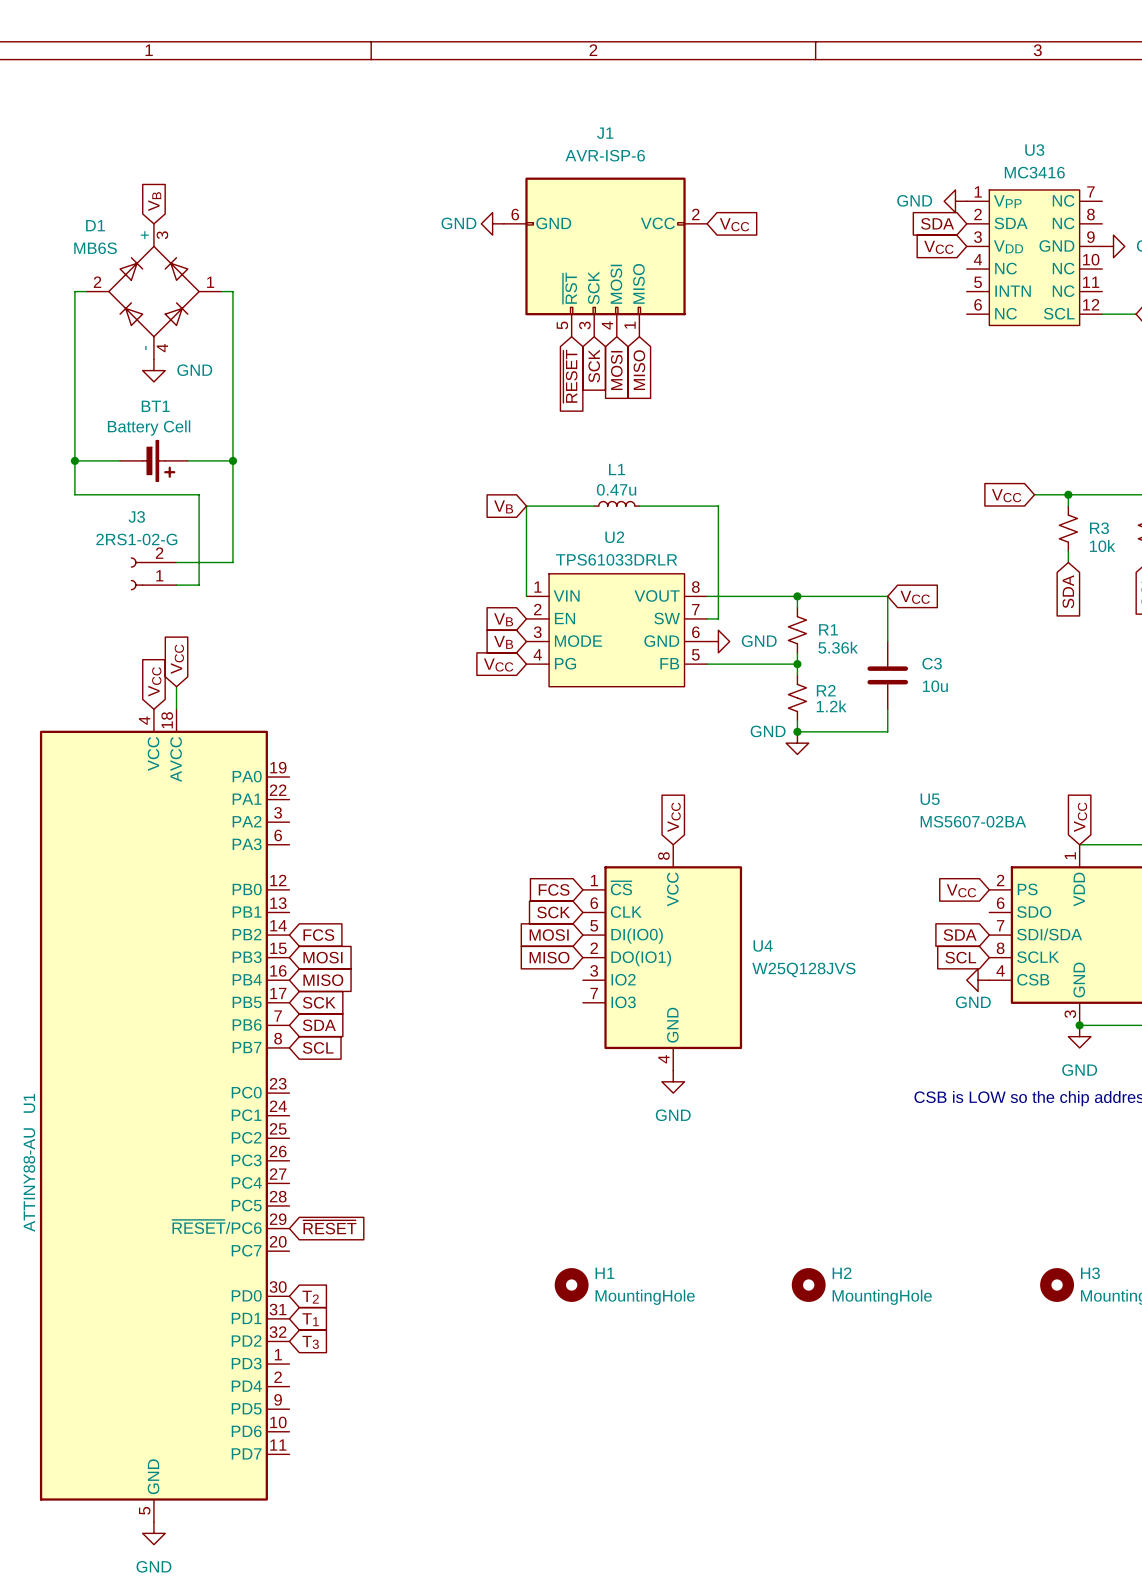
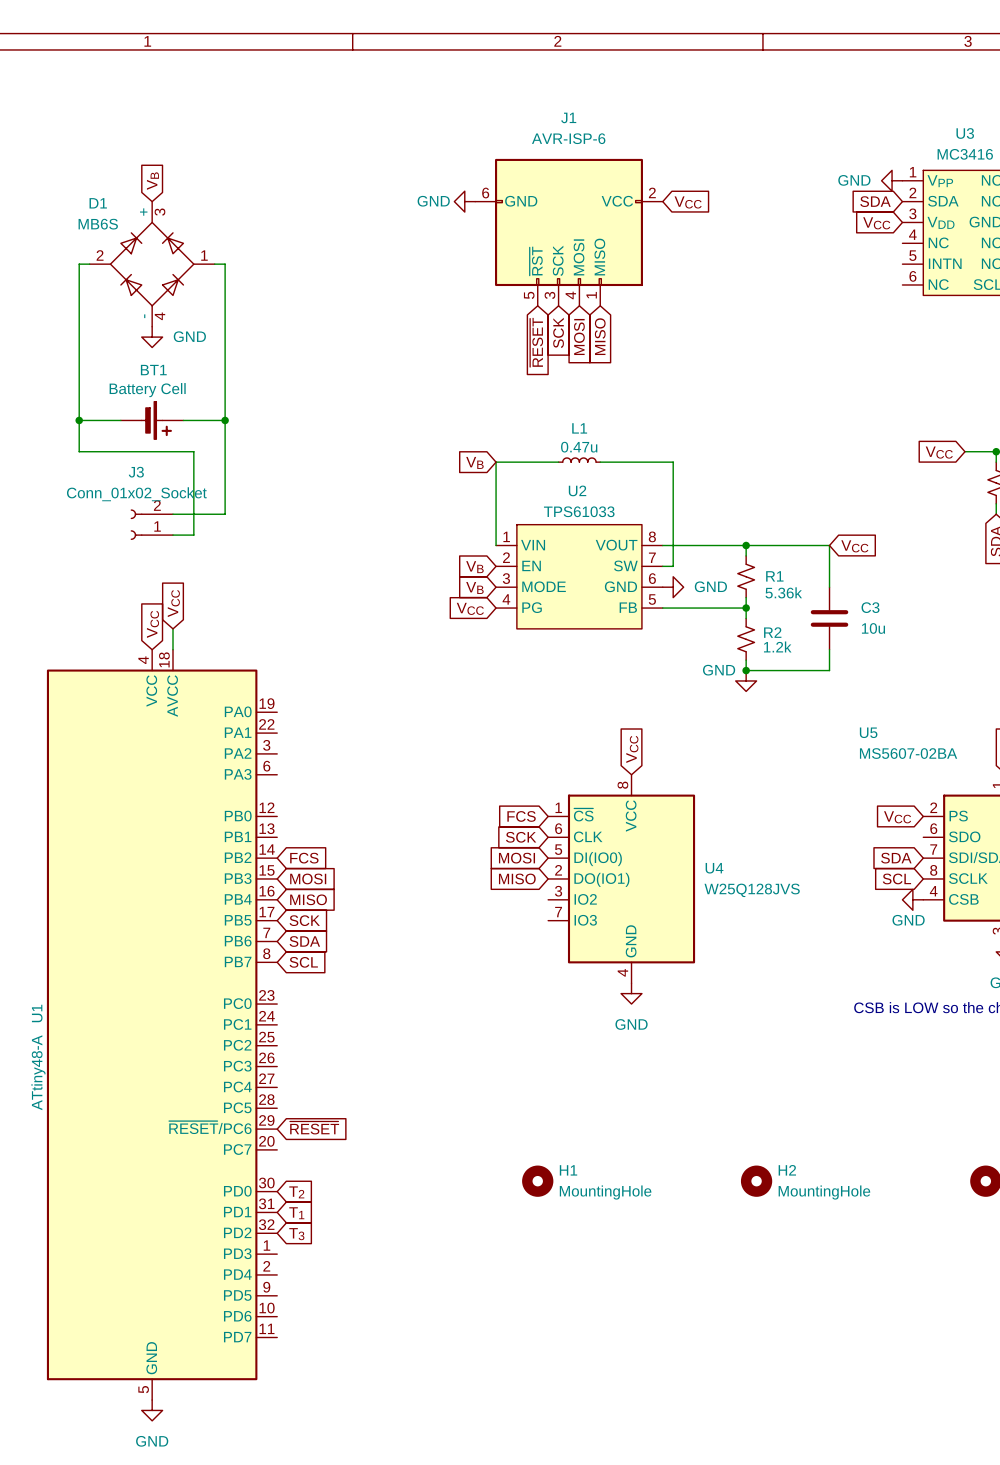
J3 value: 2RS1-02-G (136, 539) -> Conn_01x02_Socket (136, 494)
U2 value: TPS61033DRLR (616, 559) -> TPS61033 (579, 511)
U1 value: ATTINY88-AU (29, 1180) -> ATtiny48-A (38, 1072)

